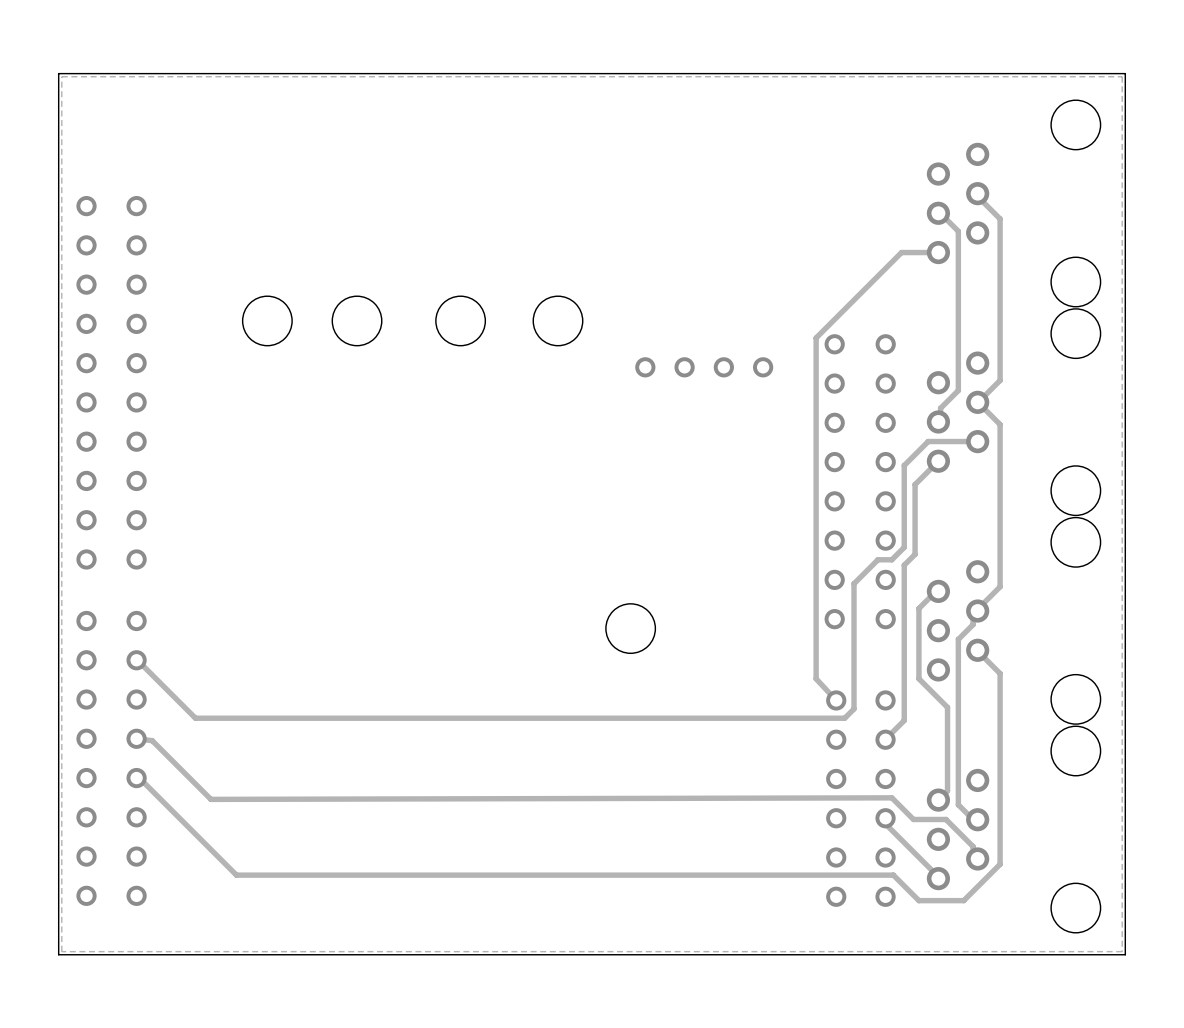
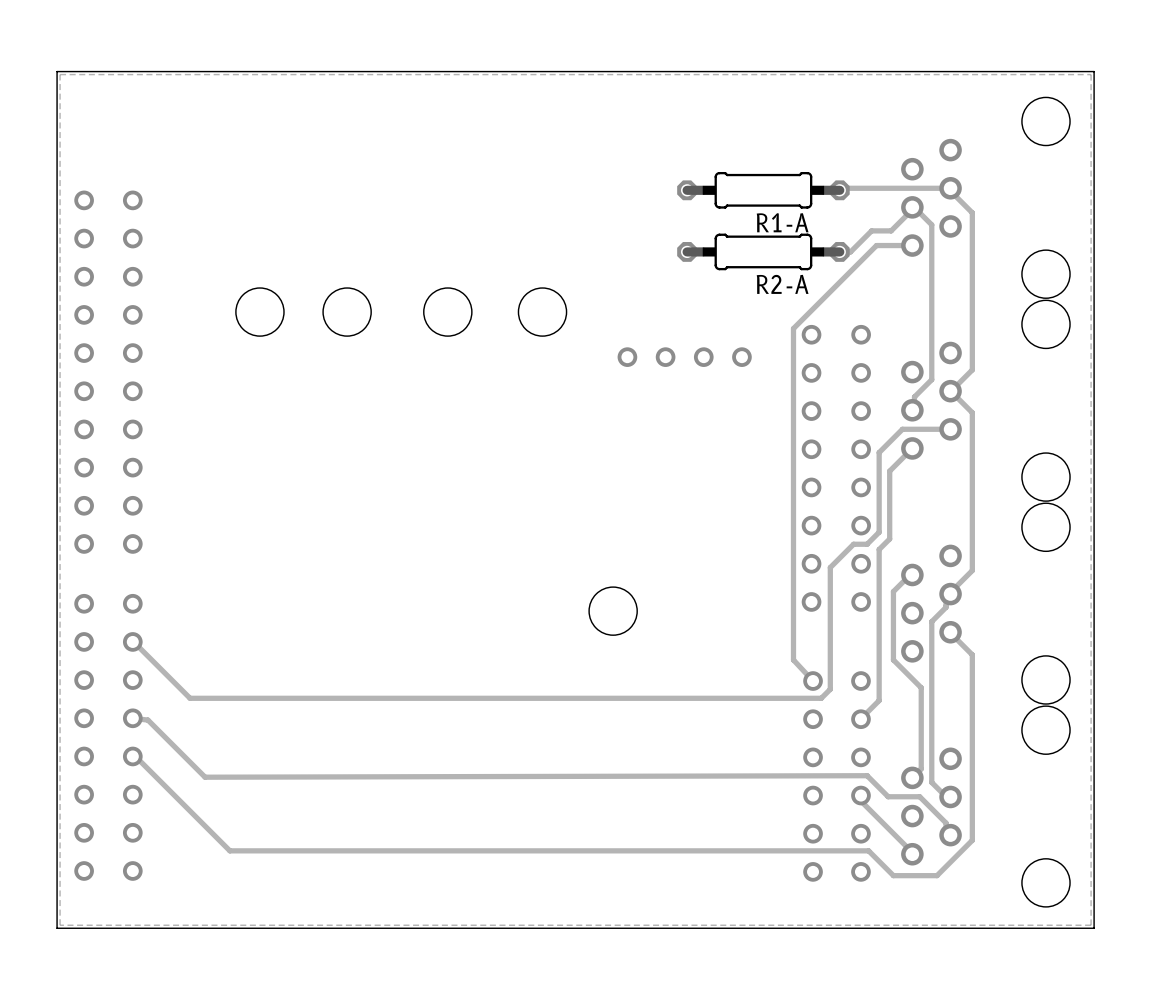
track: none -> (950, 188) (843, 188) (839, 190)
R1-A: none -> (763, 190)
track: none -> (912, 207) (891, 230) (871, 230) (850, 251) (839, 251)
R2-A: none -> (763, 251)

